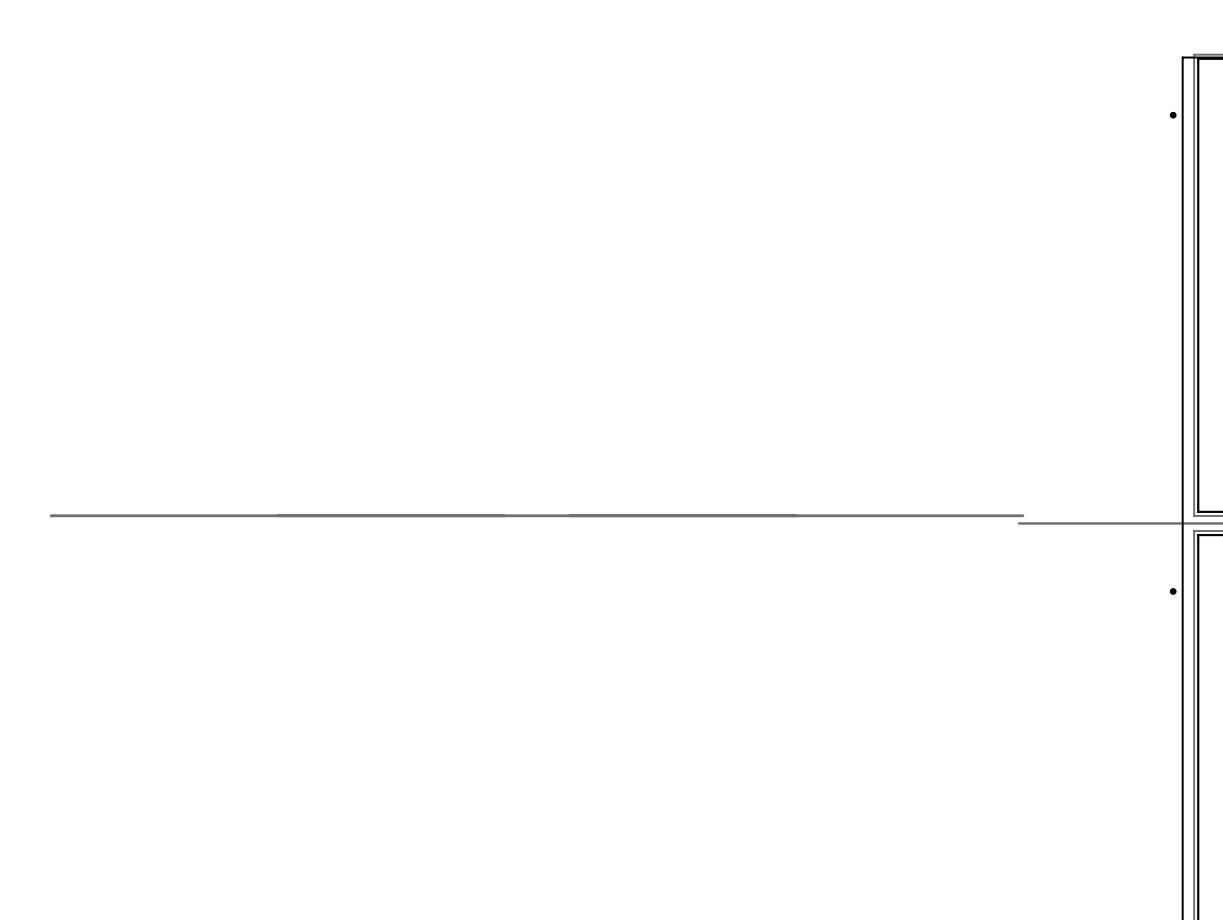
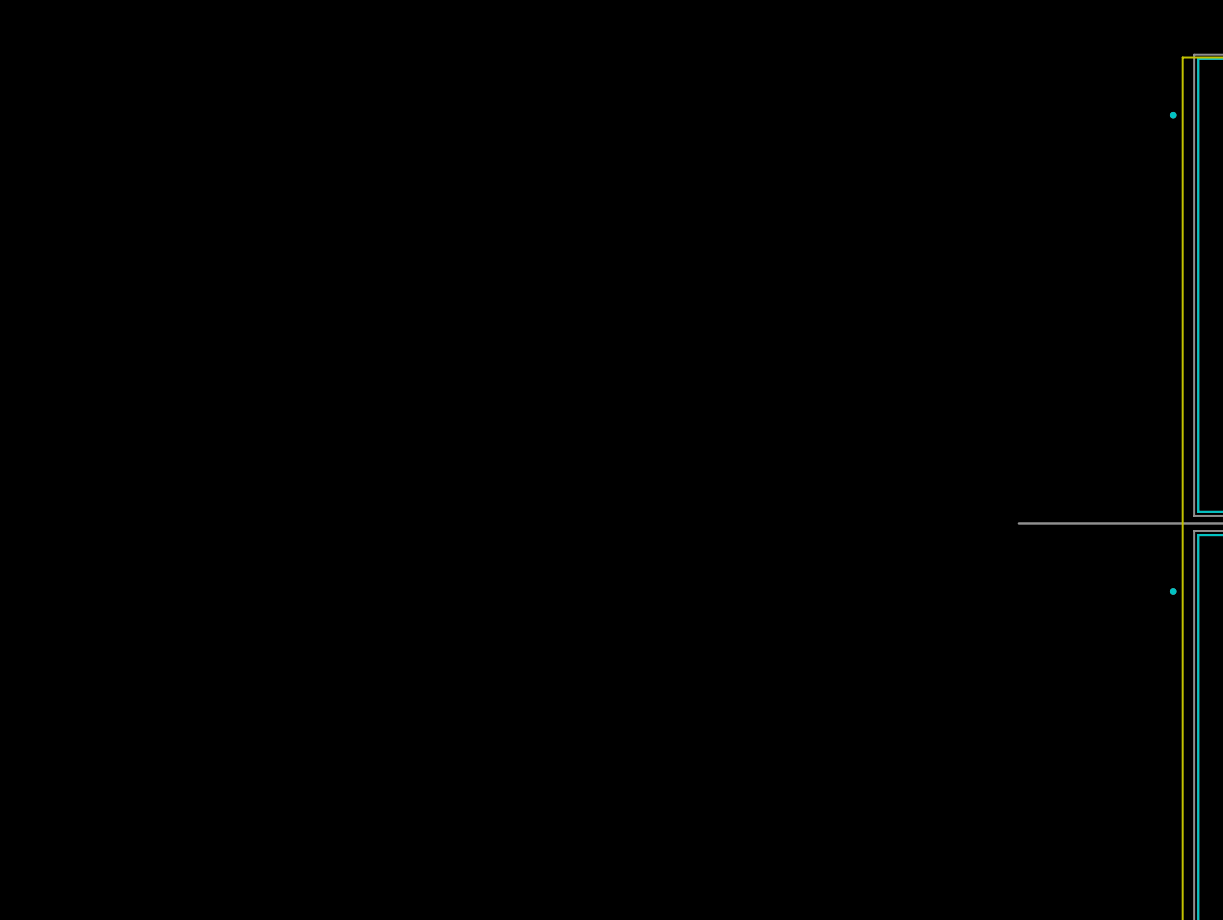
line: (51, 515) (1023, 515) -> none

